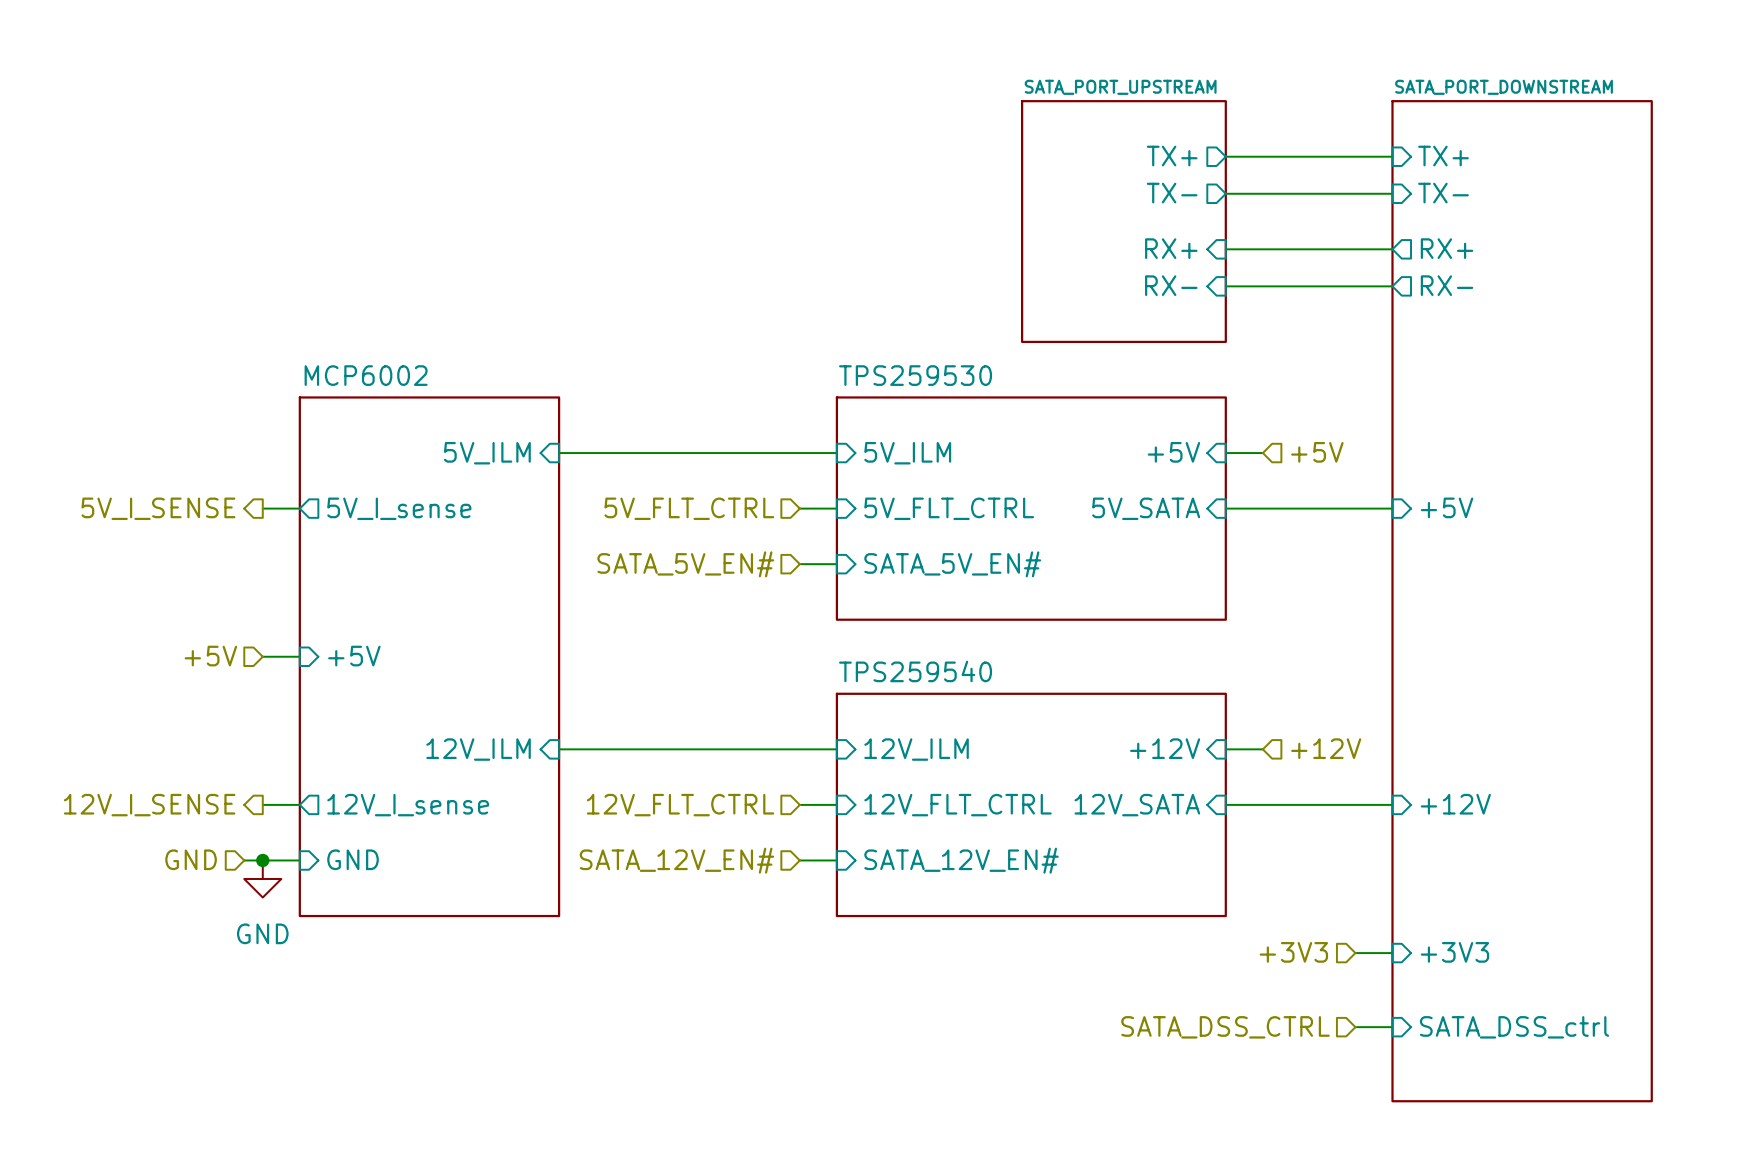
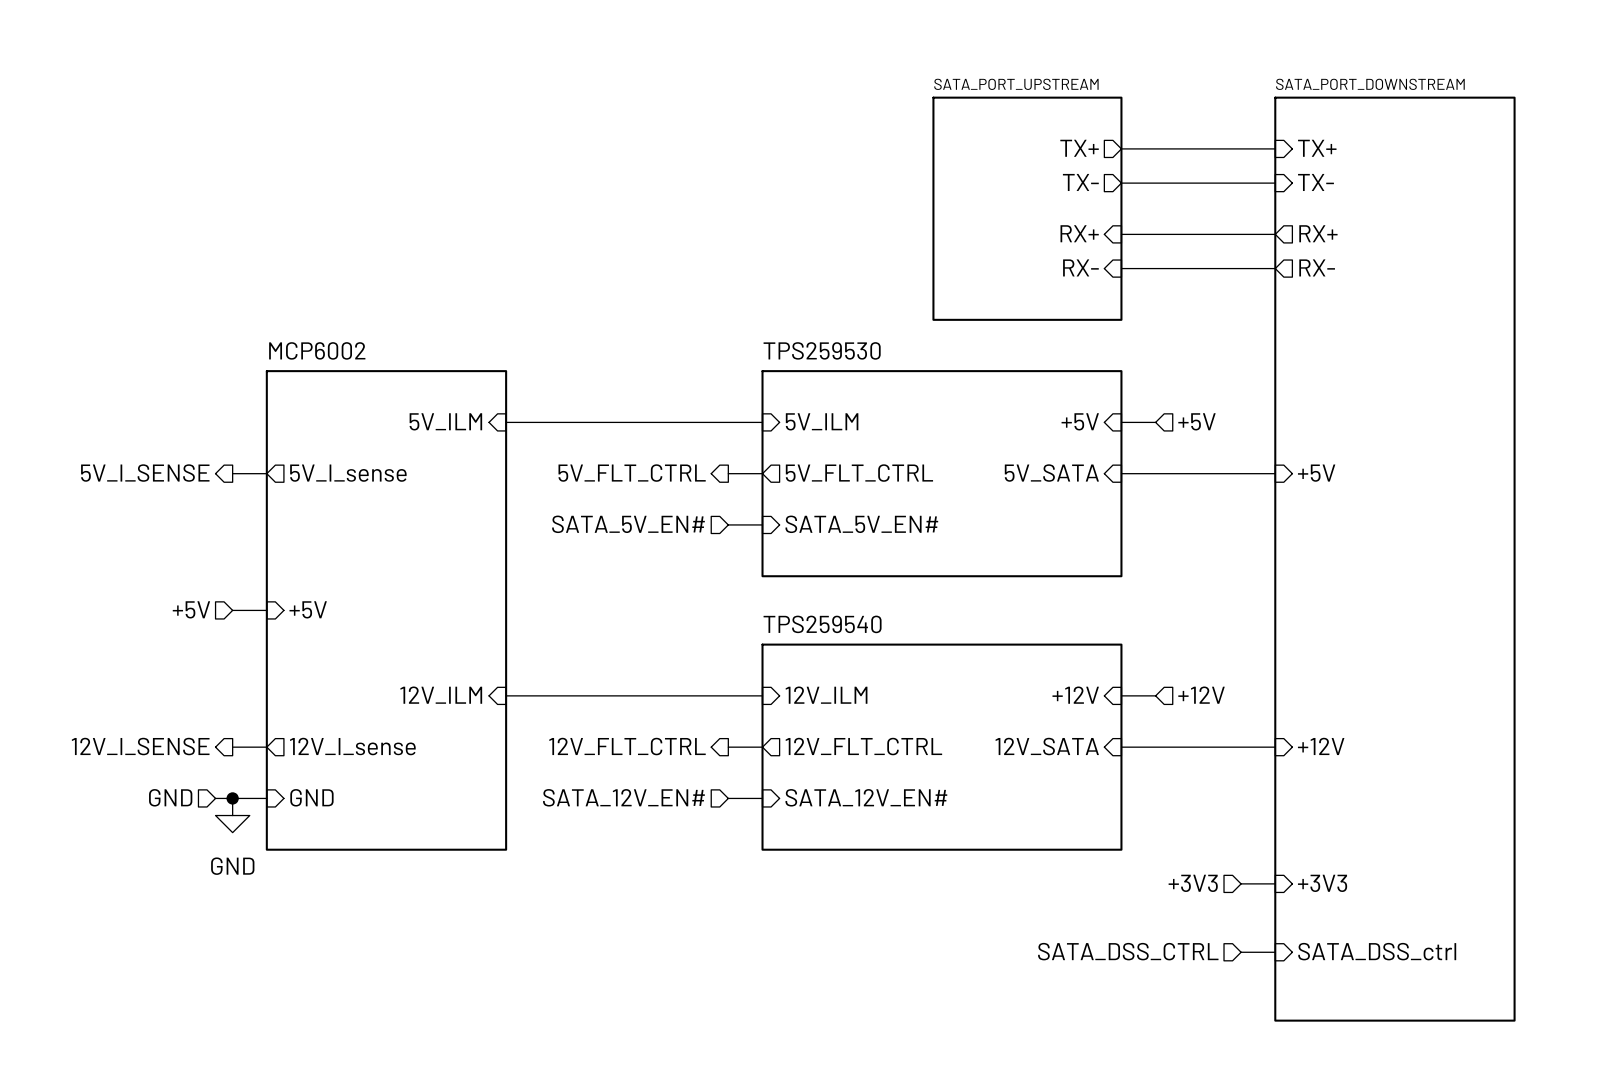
hierarchical label shape: input (689, 508) -> output (632, 473)
sheet pin shape: input (949, 508) -> output (859, 473)
hierarchical label shape: input (680, 805) -> output (627, 746)
sheet pin shape: input (958, 805) -> output (863, 746)

